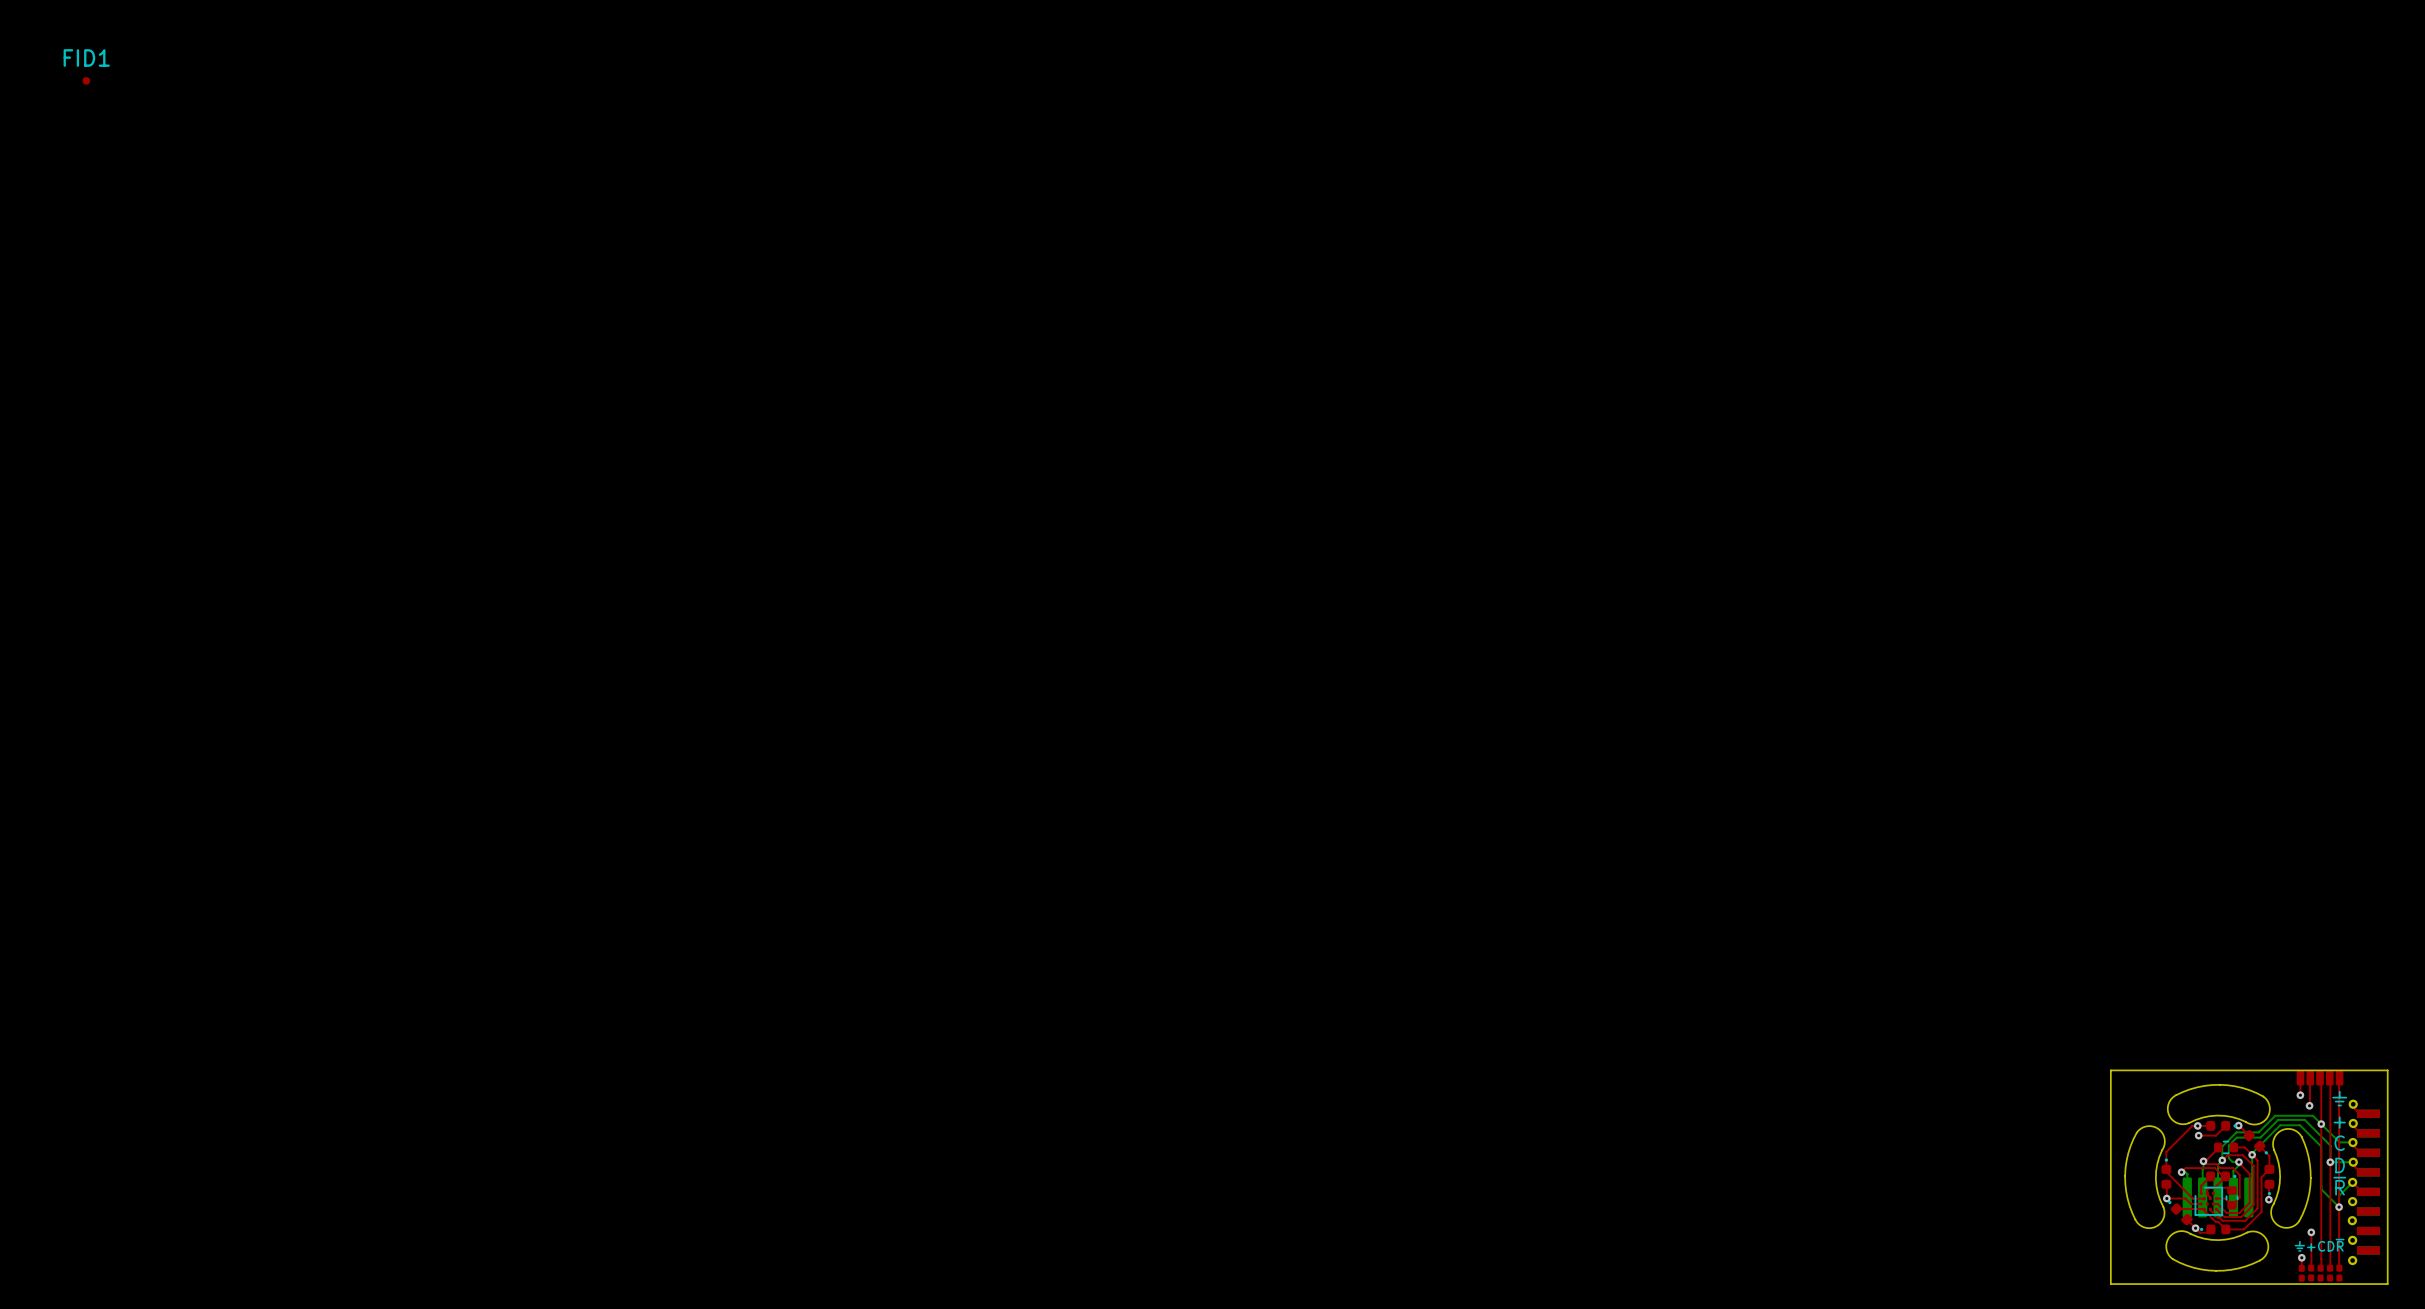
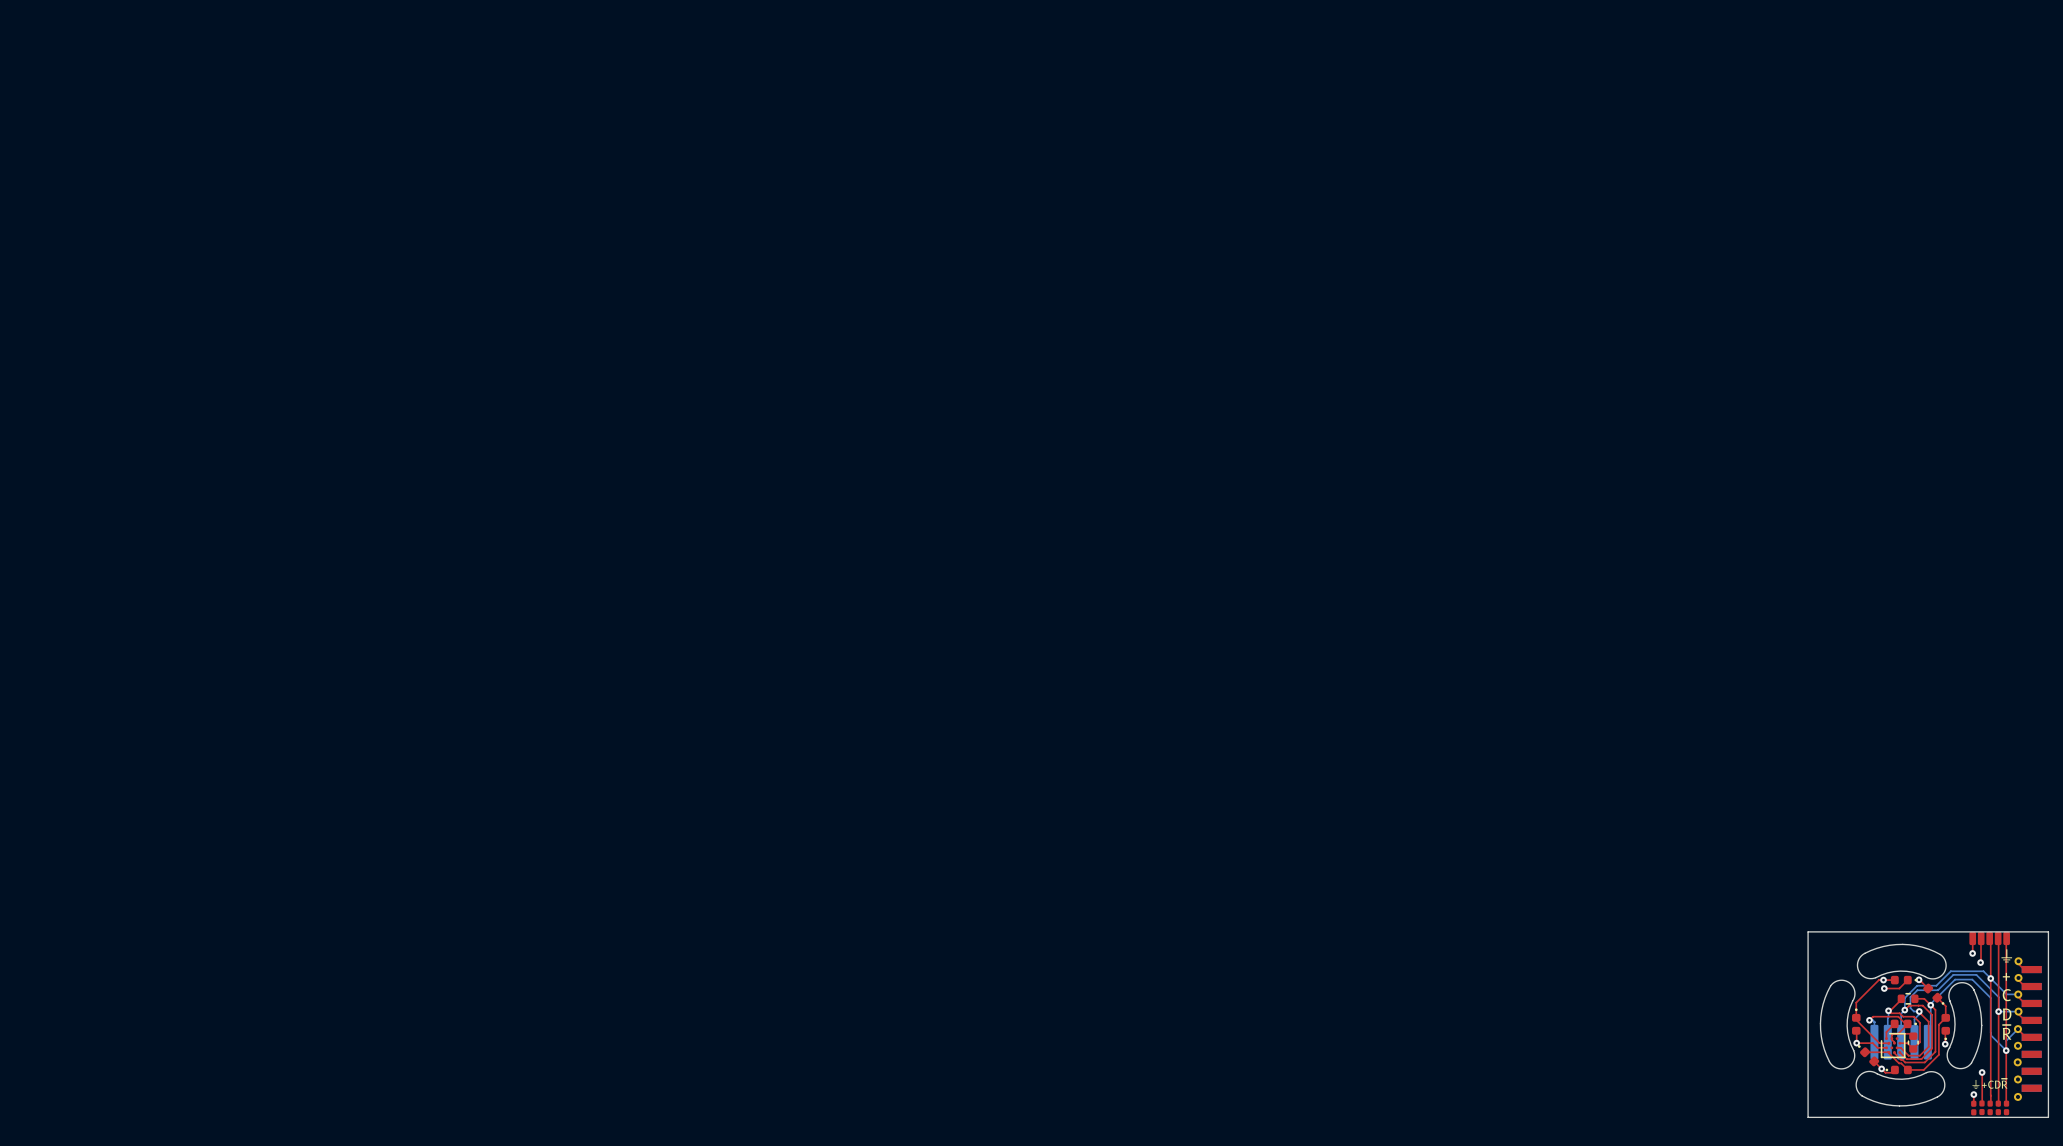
FID1: (86, 80) -> none

